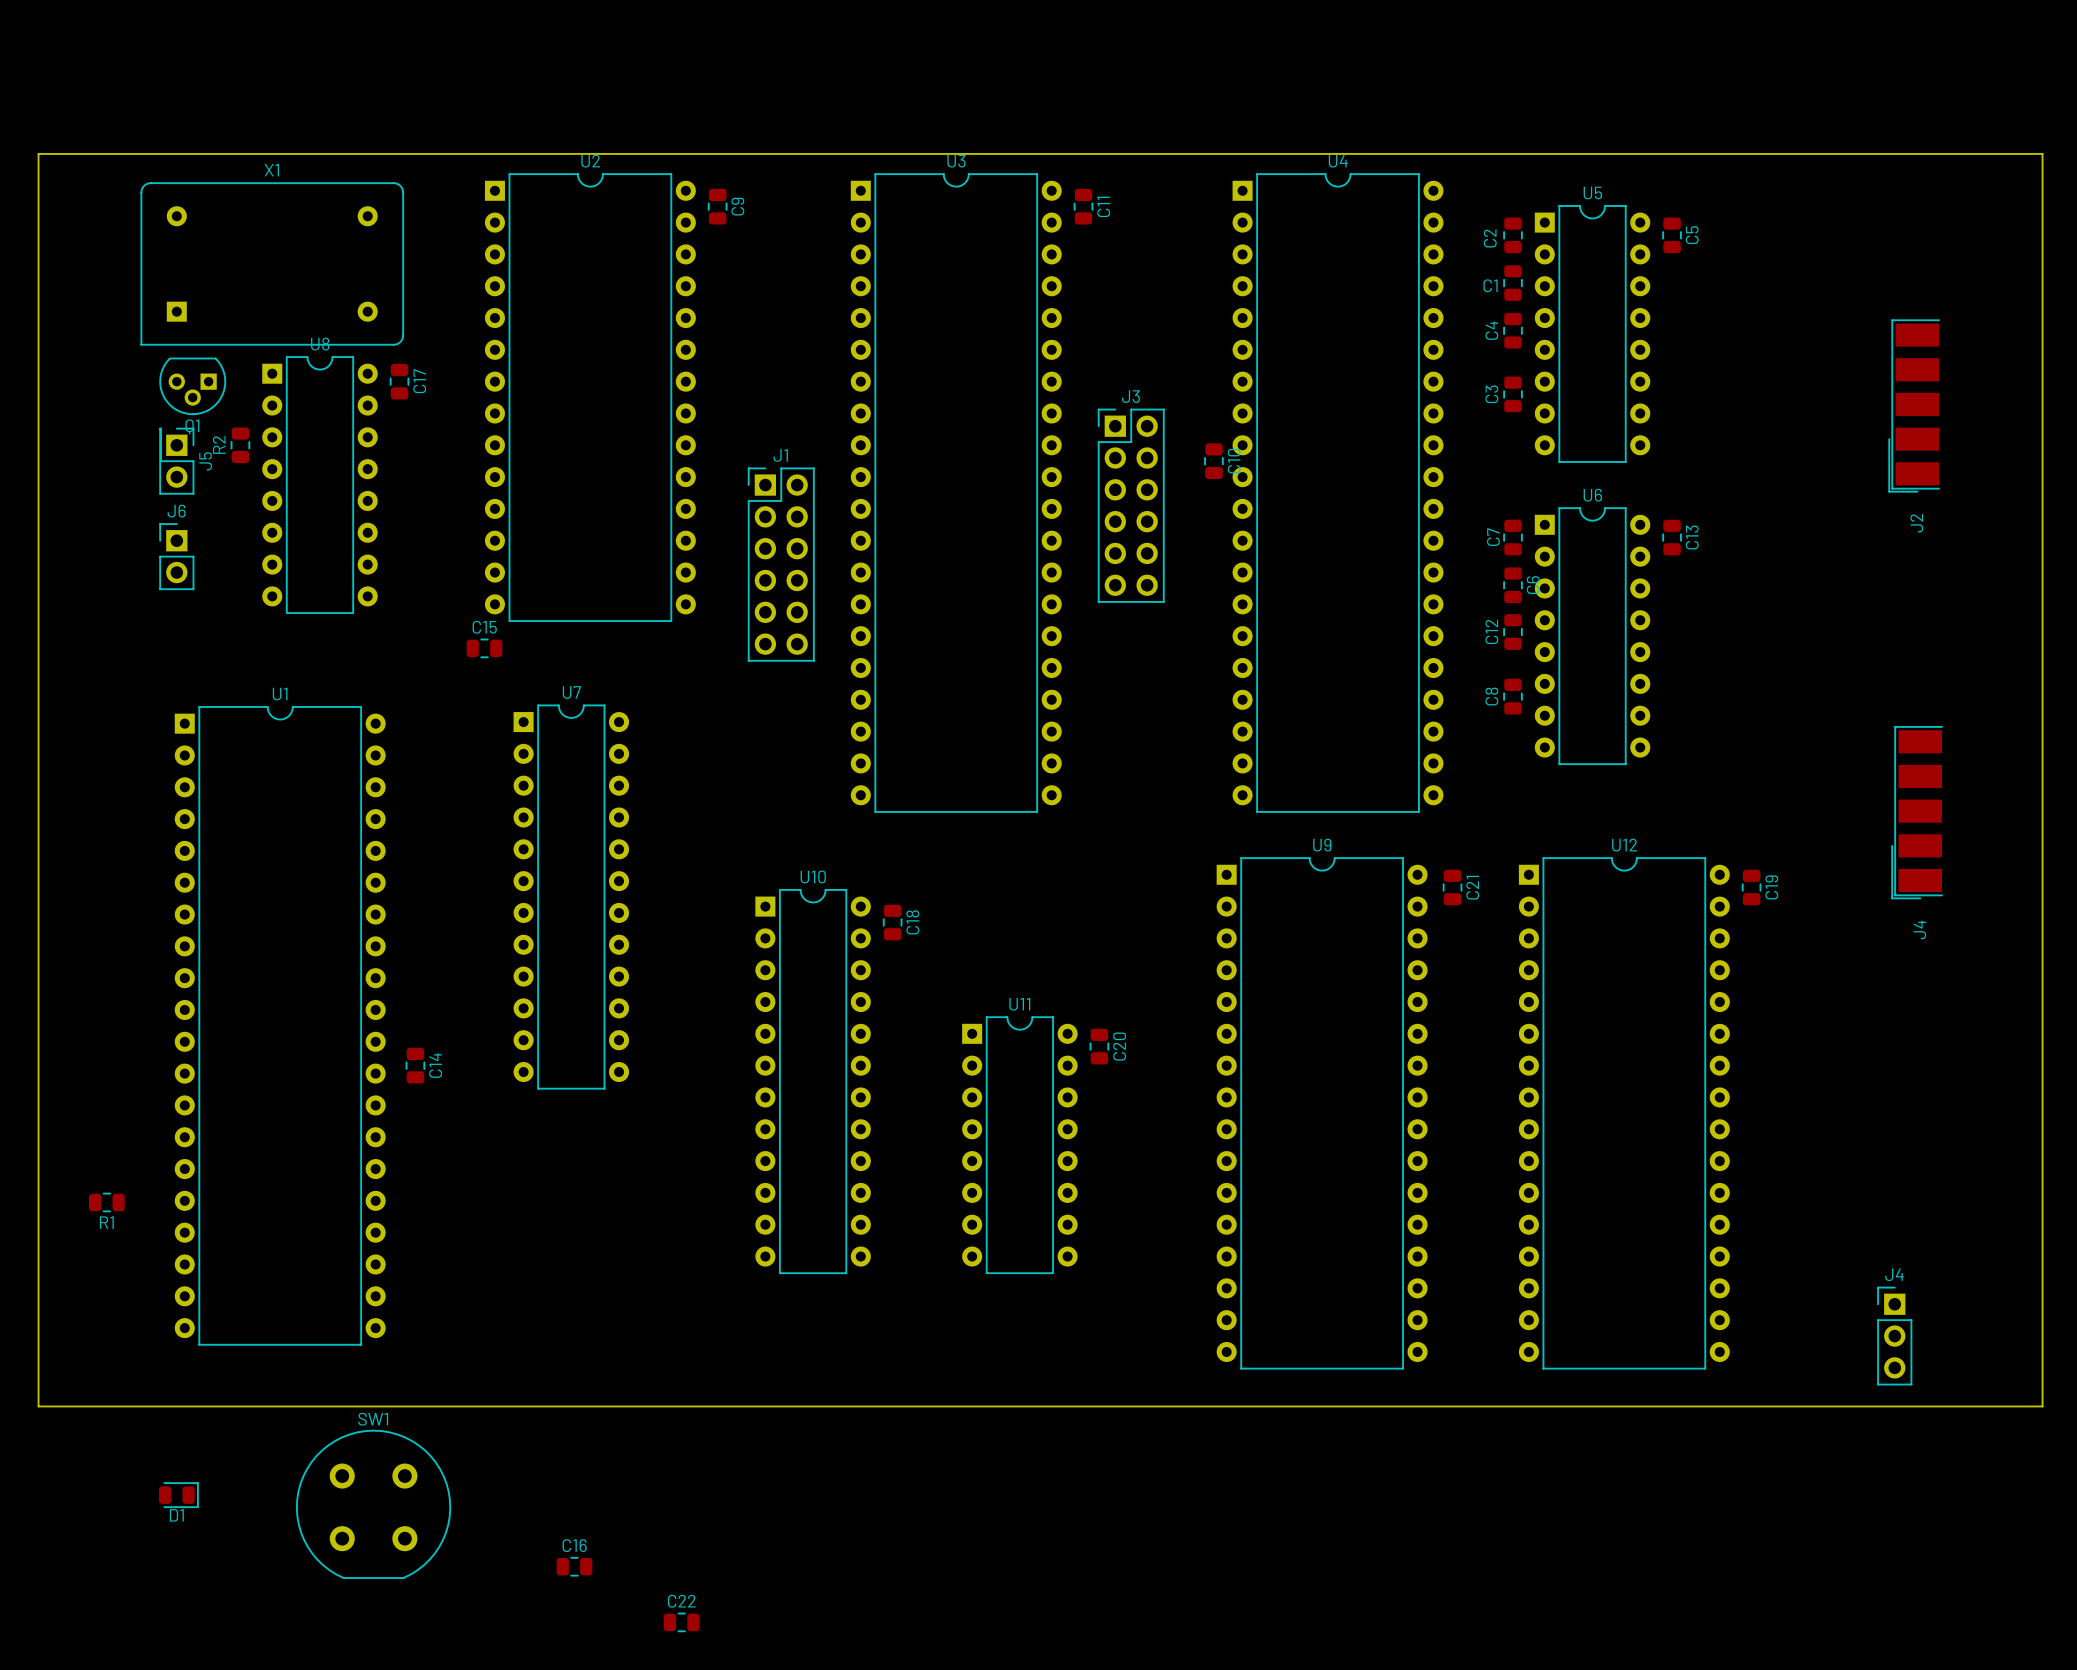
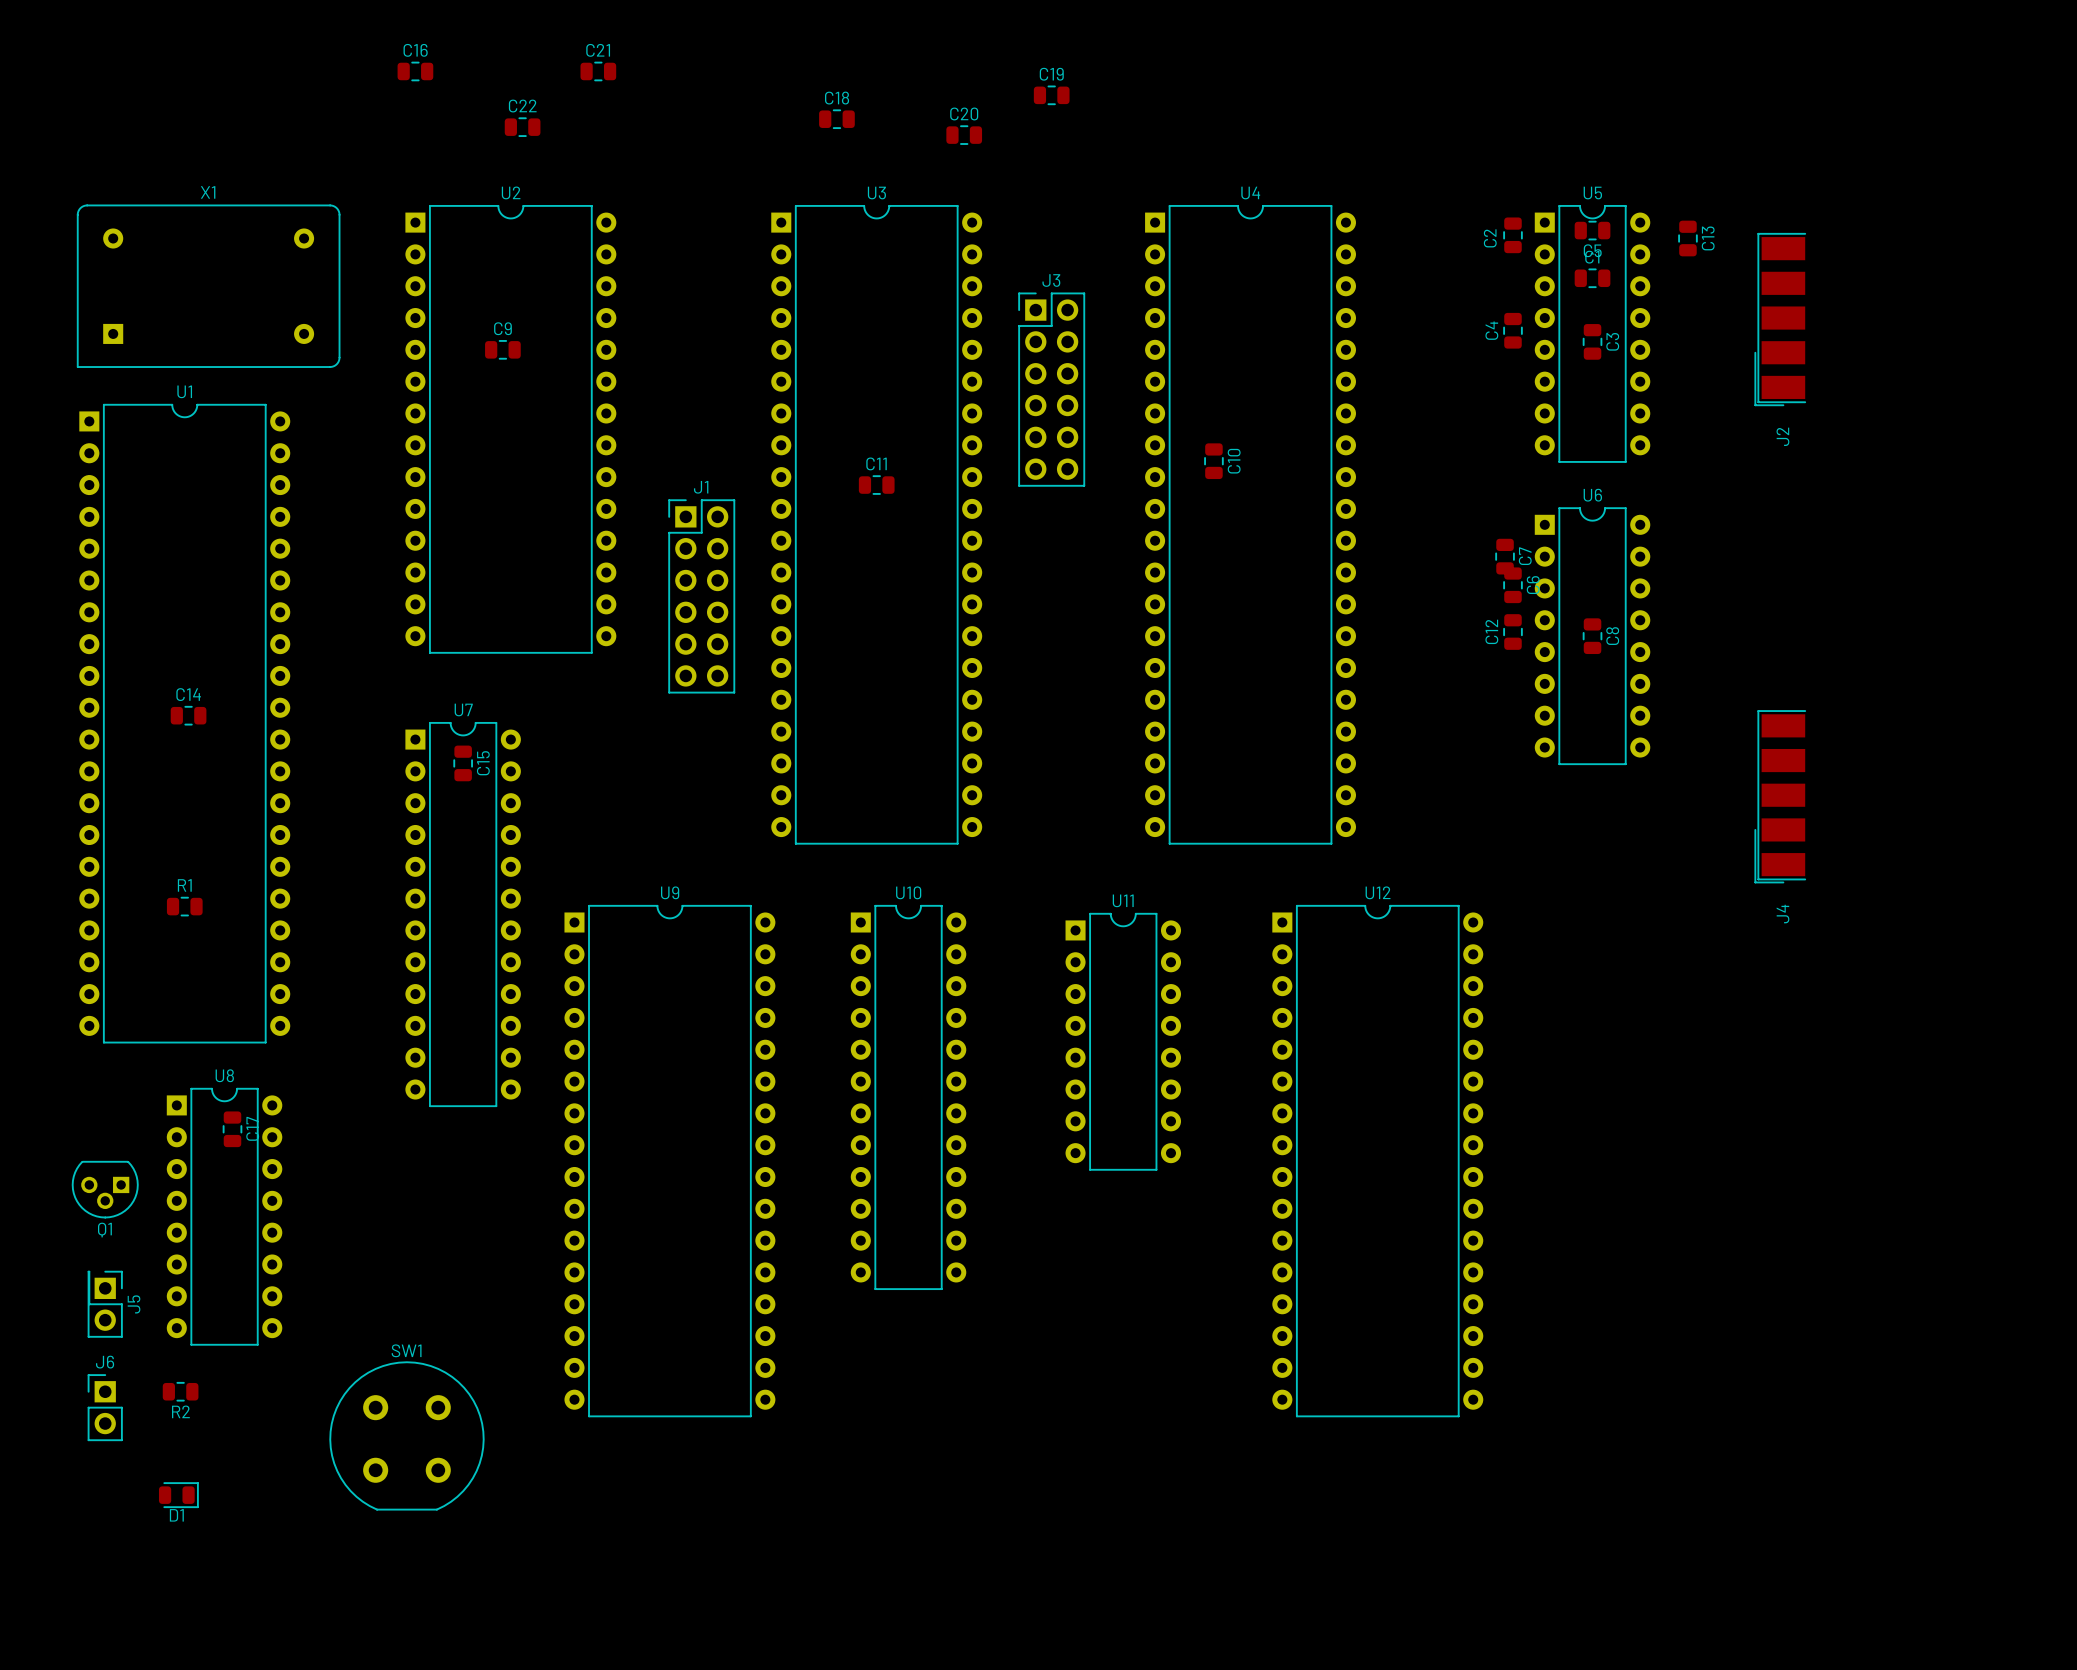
board edge: (38, 153) (38, 1406) (2042, 1406) (2042, 153) (38, 153) -> none
C9 rotation: 0° (717, 206) -> 90° clockwise (502, 349)
C9 position: (717, 206) -> (502, 349)
C9 name position: C9 (737, 206) -> C9 (502, 328)
C11 rotation: 0° (1083, 206) -> 90° clockwise (876, 485)
C11 position: (1083, 206) -> (876, 485)
C11 name position: C11 (1103, 206) -> C11 (876, 463)
C5 rotation: 0° (1672, 235) -> 90° clockwise (1592, 230)
C5 position: (1672, 235) -> (1592, 230)
X1 position: (272, 263) -> (208, 286)
C1 rotation: 0° (1512, 283) -> 90° clockwise (1592, 278)
C1 position: (1512, 283) -> (1592, 278)
C17 position: (399, 381) -> (232, 1129)
Q1 position: (192, 386) -> (105, 1189)
C3 name position: C3 (1491, 394) -> C3 (1612, 341)
C3 position: (1512, 394) -> (1592, 341)
U2 position: (590, 397) -> (510, 429)
J2 position: (1914, 405) -> (1780, 319)
R2 name position: R2 (219, 444) -> R2 (180, 1411)
R2 rotation: 0° (240, 445) -> 90° clockwise (180, 1391)
R2 position: (240, 445) -> (180, 1391)
J5 position: (176, 461) -> (105, 1304)
U8 position: (319, 485) -> (224, 1216)
U3 position: (956, 493) -> (876, 524)
U4 position: (1338, 493) -> (1250, 524)
J3 position: (1131, 505) -> (1051, 389)
C7 name position: C7 (1493, 537) -> C7 (1525, 556)
C7 position: (1512, 537) -> (1505, 556)
C13 position: (1672, 537) -> (1687, 238)
J6 position: (176, 556) -> (105, 1407)
J1 position: (781, 564) -> (701, 596)
C15 rotation: 0° (484, 648) -> 90° clockwise (463, 763)
C15 position: (484, 648) -> (463, 763)
C8 name position: C8 (1491, 696) -> C8 (1612, 636)
C8 position: (1512, 696) -> (1592, 636)
J4 position: (1917, 812) -> (1780, 796)
C21 rotation: 0° (1452, 887) -> 90° clockwise (598, 71)
C21 position: (1452, 887) -> (598, 71)
C21 name position: C21 (1472, 887) -> C21 (598, 50)
C19 rotation: 0° (1751, 887) -> 90° clockwise (1051, 95)
C19 position: (1751, 887) -> (1051, 95)
C19 name position: C19 (1771, 887) -> C19 (1051, 74)
U7 position: (571, 897) -> (463, 914)
C18 rotation: 0° (892, 922) -> 90° clockwise (836, 119)
C18 position: (892, 922) -> (836, 119)
C18 name position: C18 (912, 922) -> C18 (837, 98)
U1 position: (280, 1025) -> (184, 723)
C20 rotation: 0° (1099, 1046) -> 90° clockwise (964, 135)
C20 position: (1099, 1046) -> (964, 135)
C20 name position: C20 (1119, 1046) -> C20 (964, 113)
C14 rotation: 0° (415, 1065) -> 90° clockwise (188, 715)
C14 position: (415, 1065) -> (188, 715)
C14 name position: C14 (435, 1065) -> C14 (188, 694)
U10 position: (813, 1081) -> (908, 1097)
U9 position: (1322, 1113) -> (669, 1161)
U12 position: (1624, 1113) -> (1377, 1161)
U11 position: (1019, 1145) -> (1123, 1041)
R1 position: (106, 1202) -> (184, 906)
R1 name position: R1 (106, 1222) -> R1 (184, 885)
J4: (1894, 1336) -> none
SW1 position: (373, 1504) -> (406, 1435)
C16 position: (574, 1566) -> (415, 71)
C22 position: (681, 1622) -> (522, 127)

